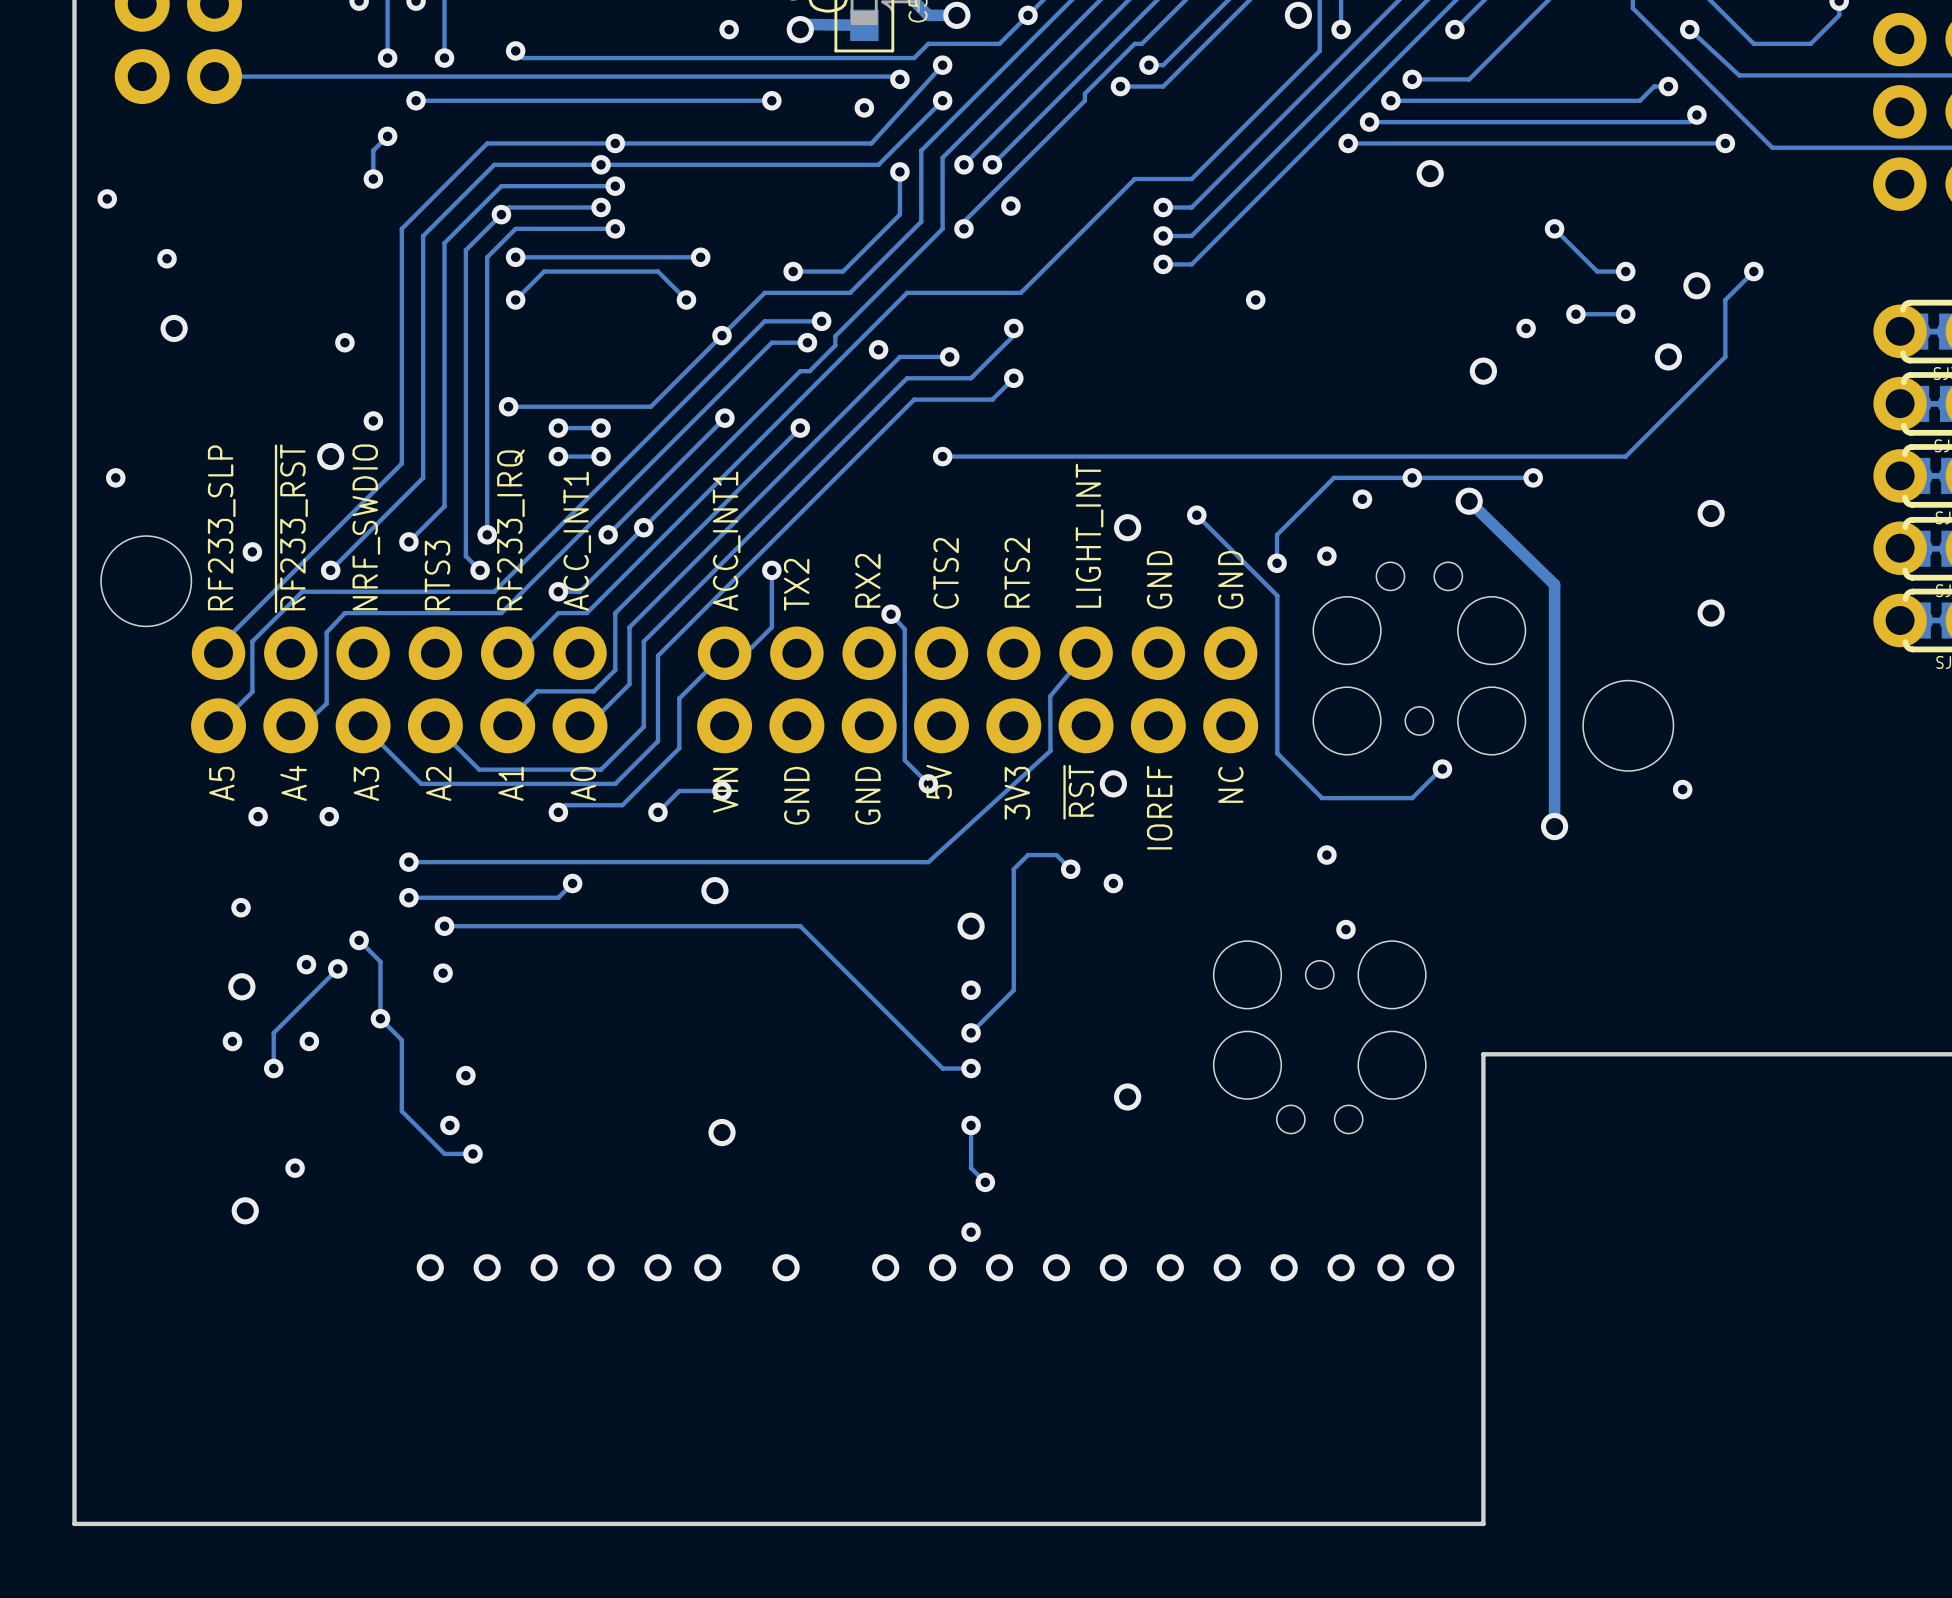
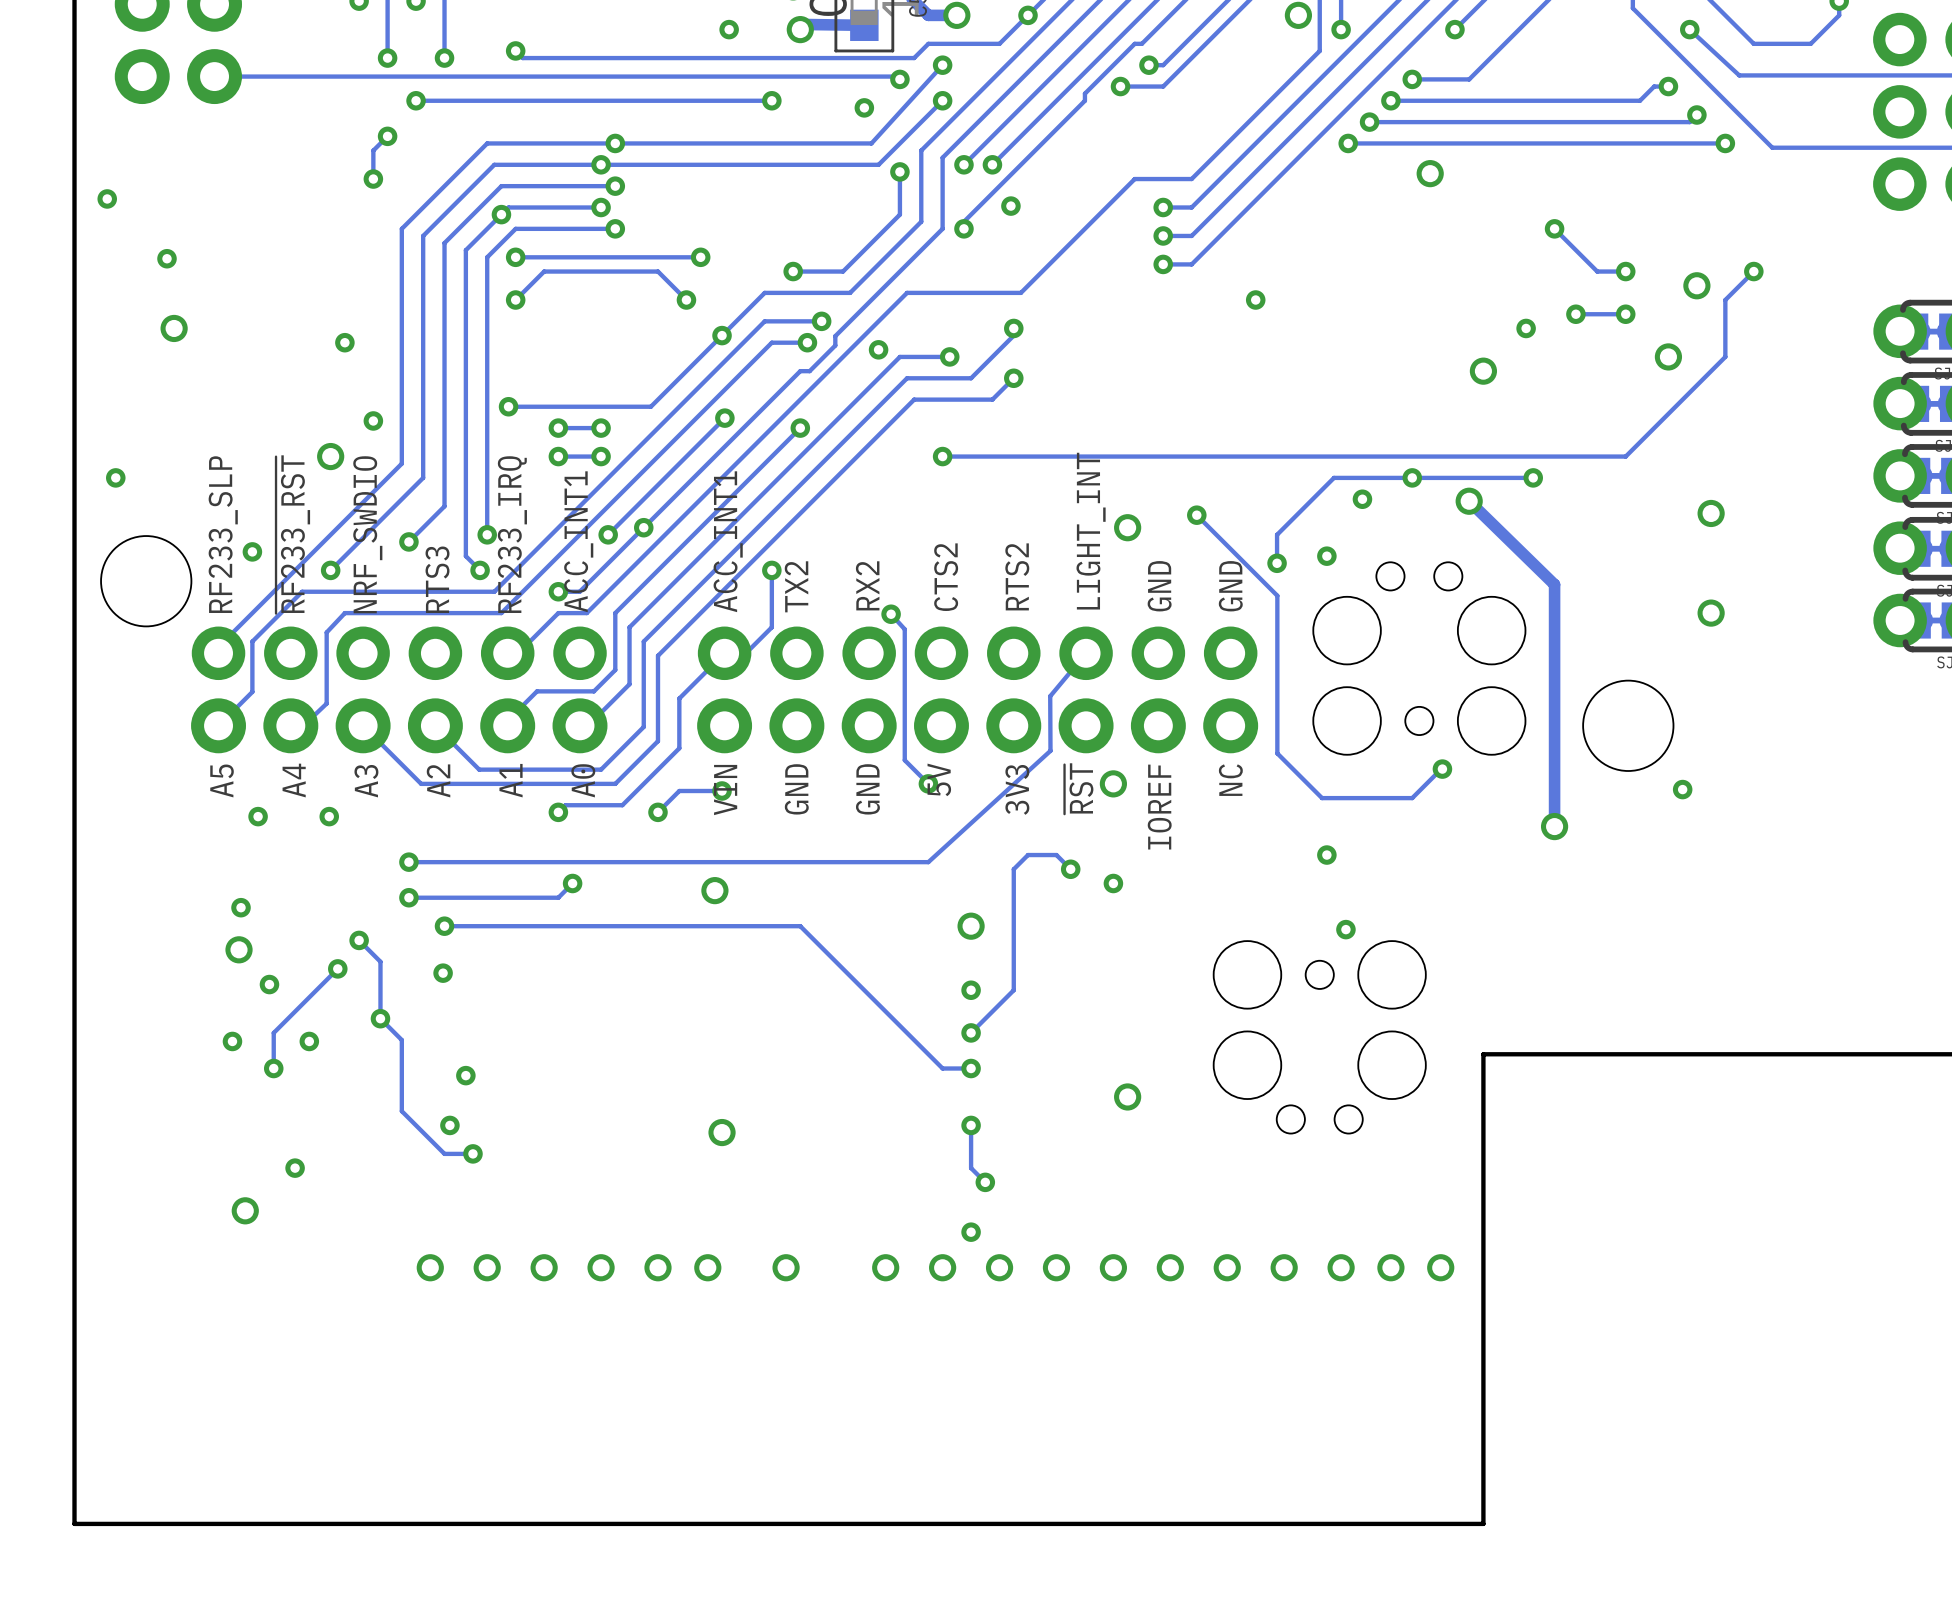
via position: (306, 964) -> (269, 984)
via position: (241, 986) -> (239, 949)

